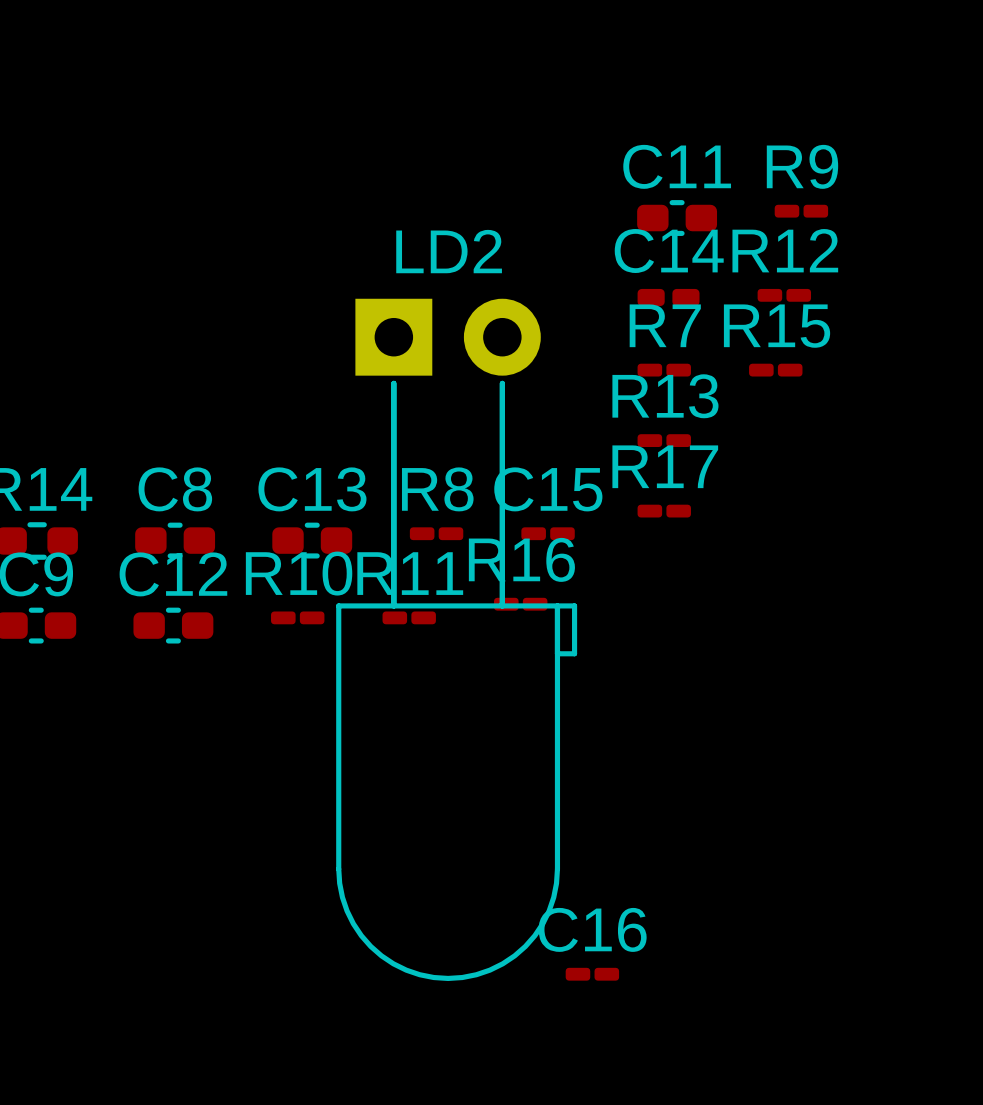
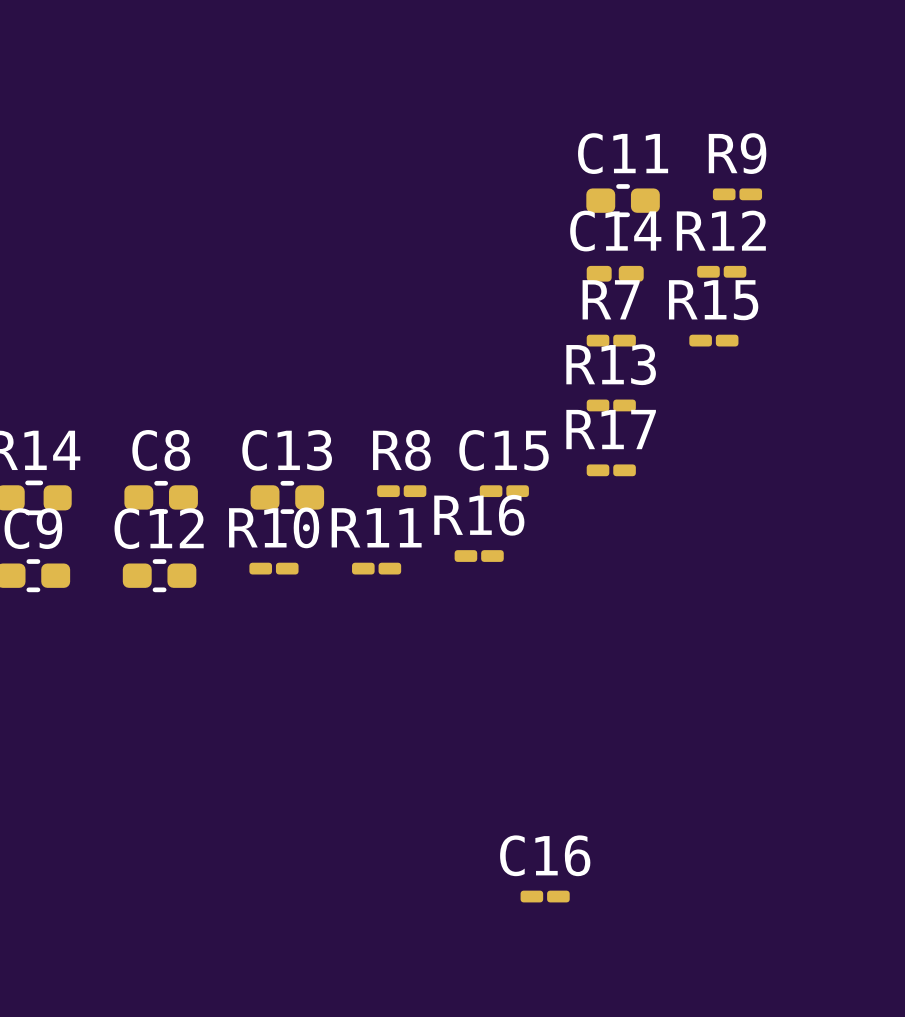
LD2: (456, 639) -> none

